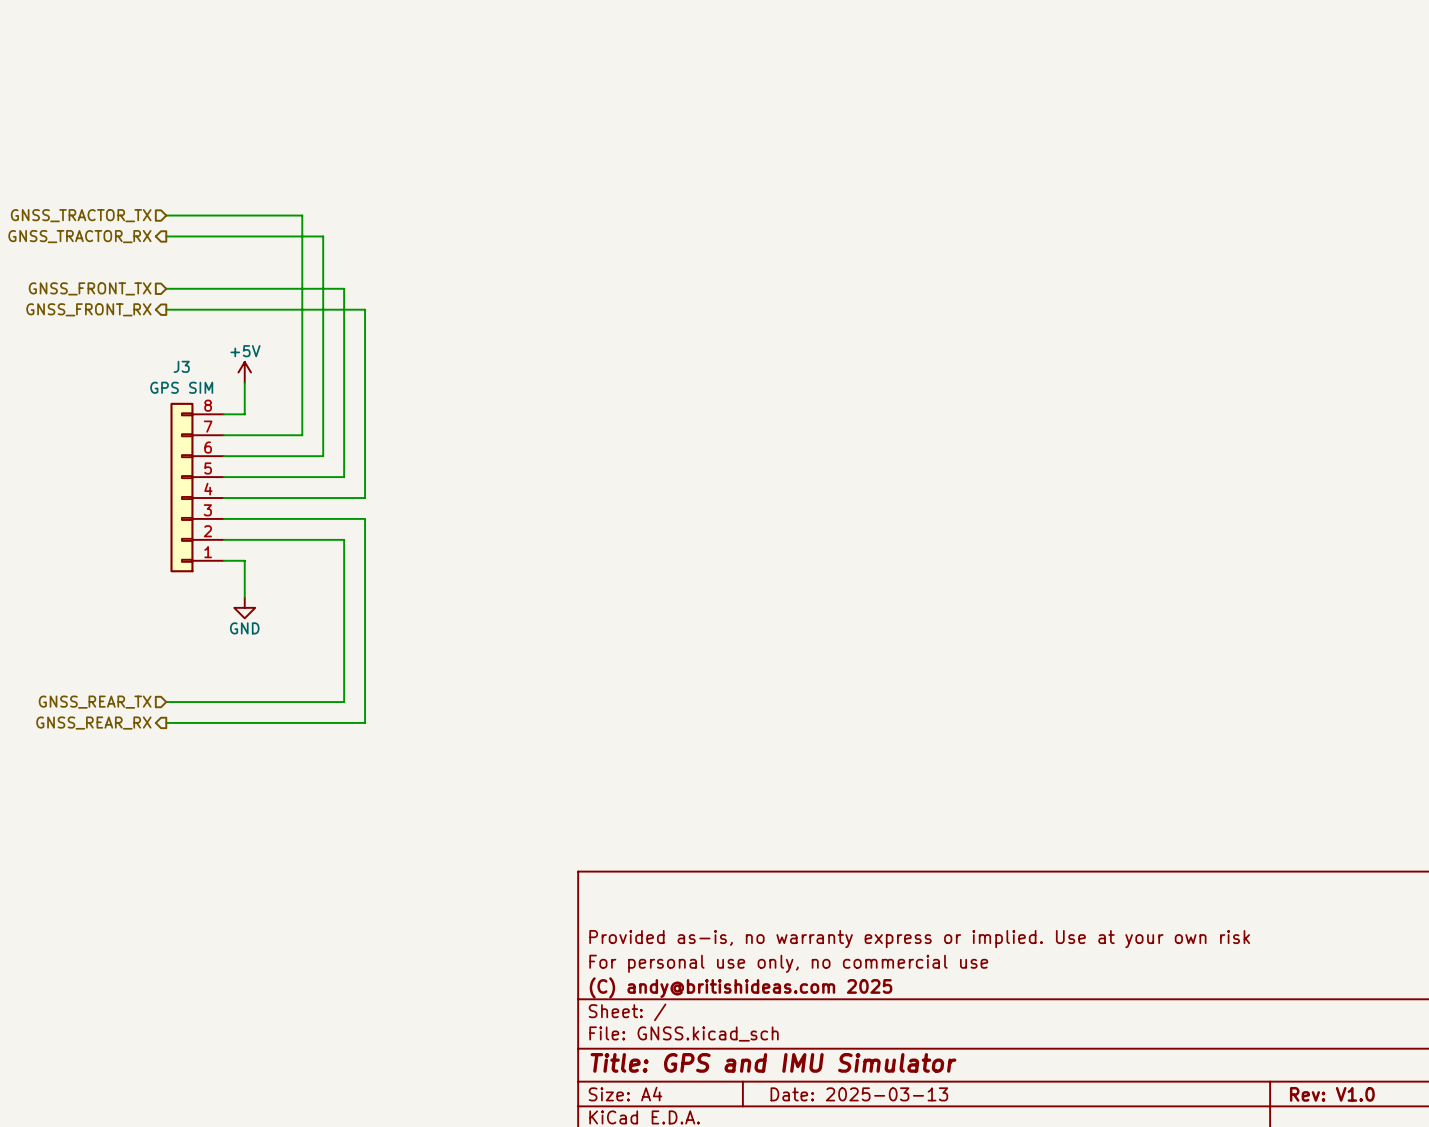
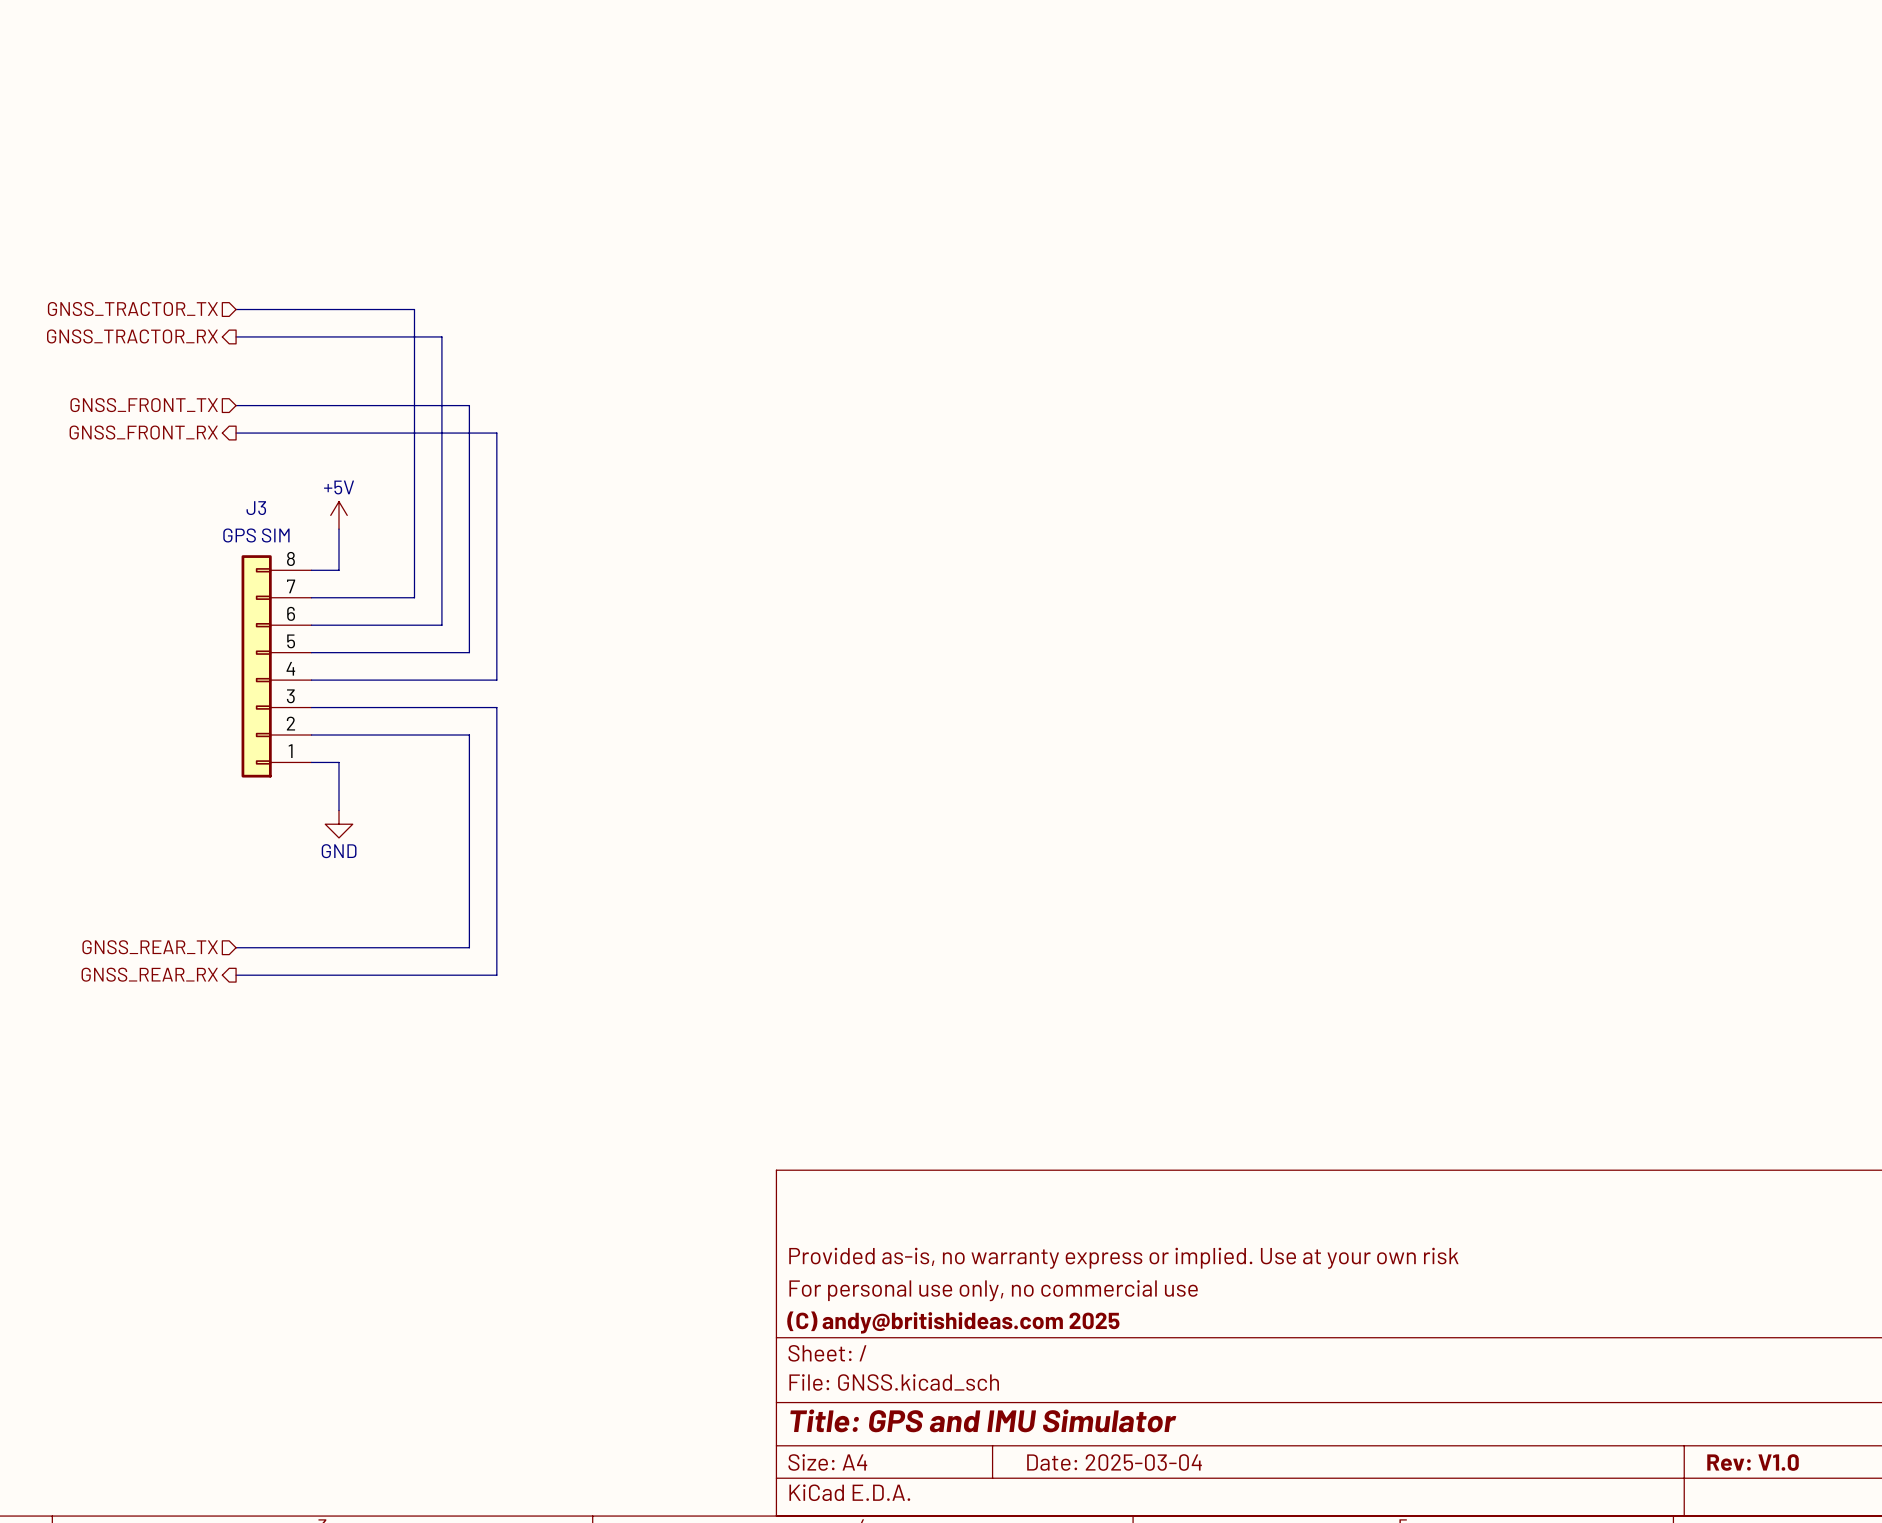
title block: Date: 2025-03-13 (859, 1094) -> Date: 2025-03-04 (1114, 1462)

